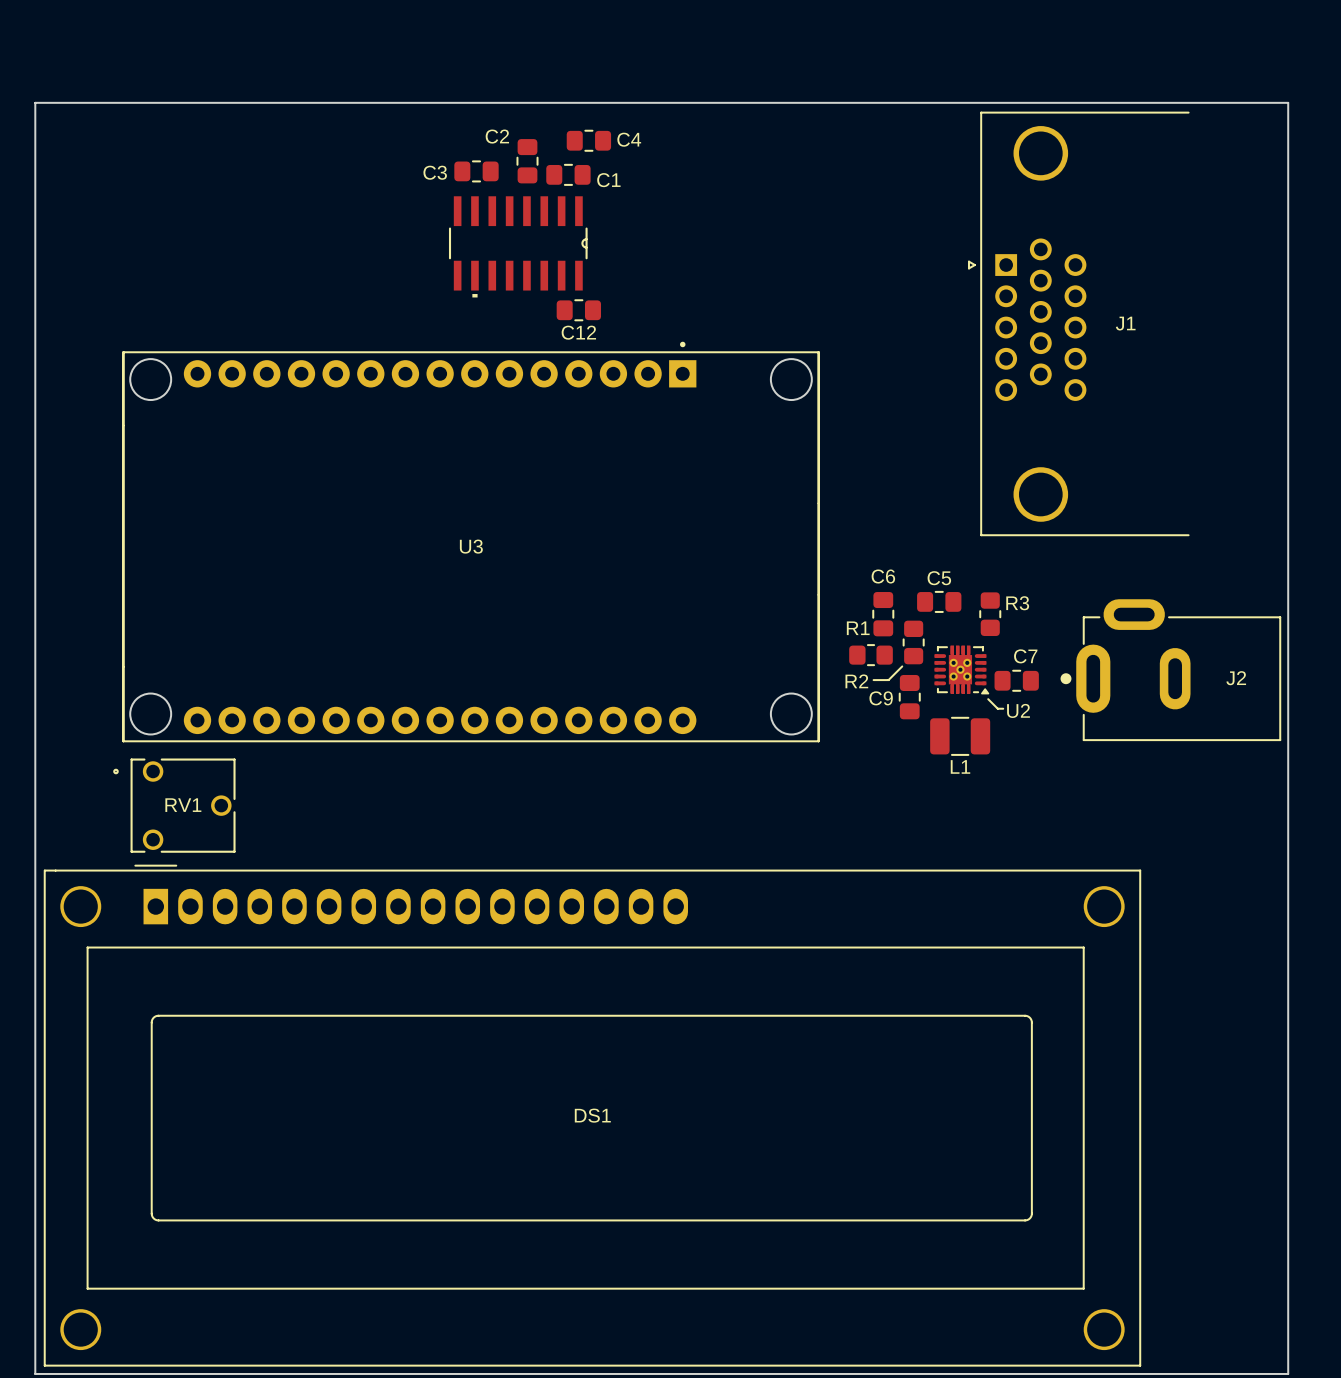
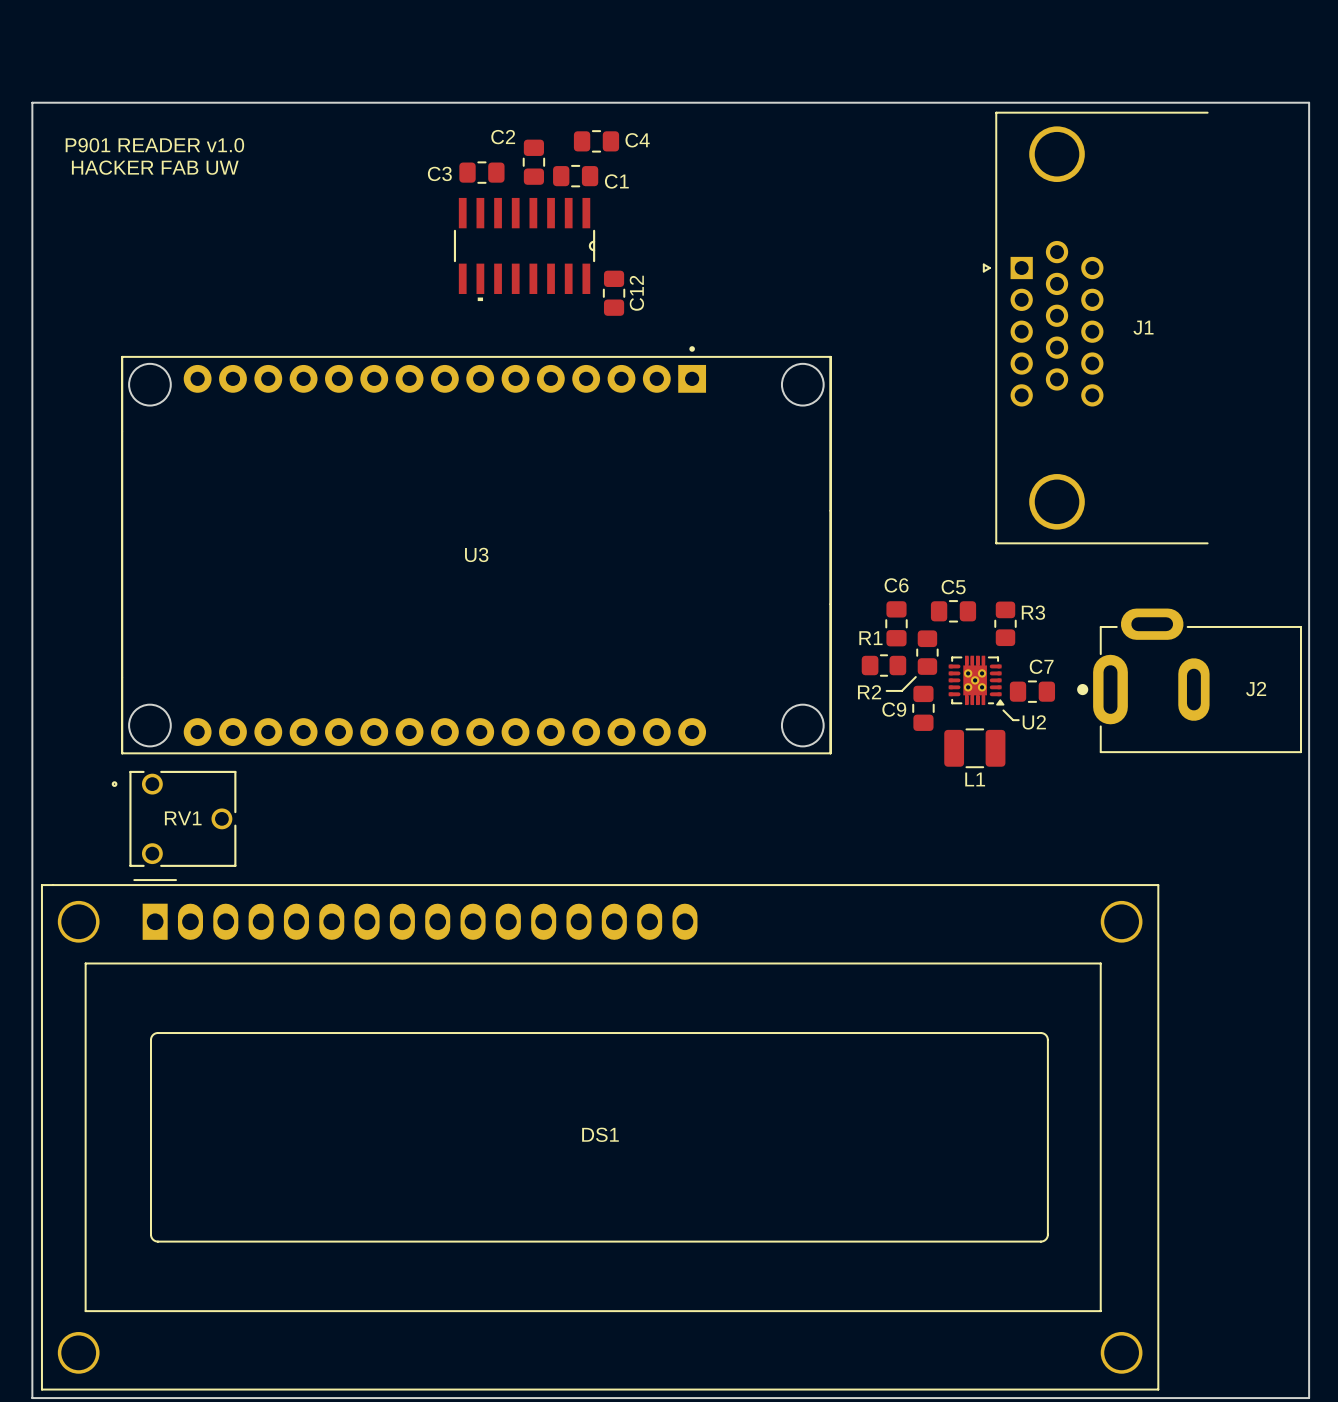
text: none -> P901 READER v1.0 (154, 145)
text: none -> HACKER FAB UW (155, 167)
C12 rotation: 0° (578, 310) -> 90° clockwise (614, 293)
C12 position: (578, 310) -> (614, 293)
C12 name position: C12 (578, 332) -> C12 (636, 293)

